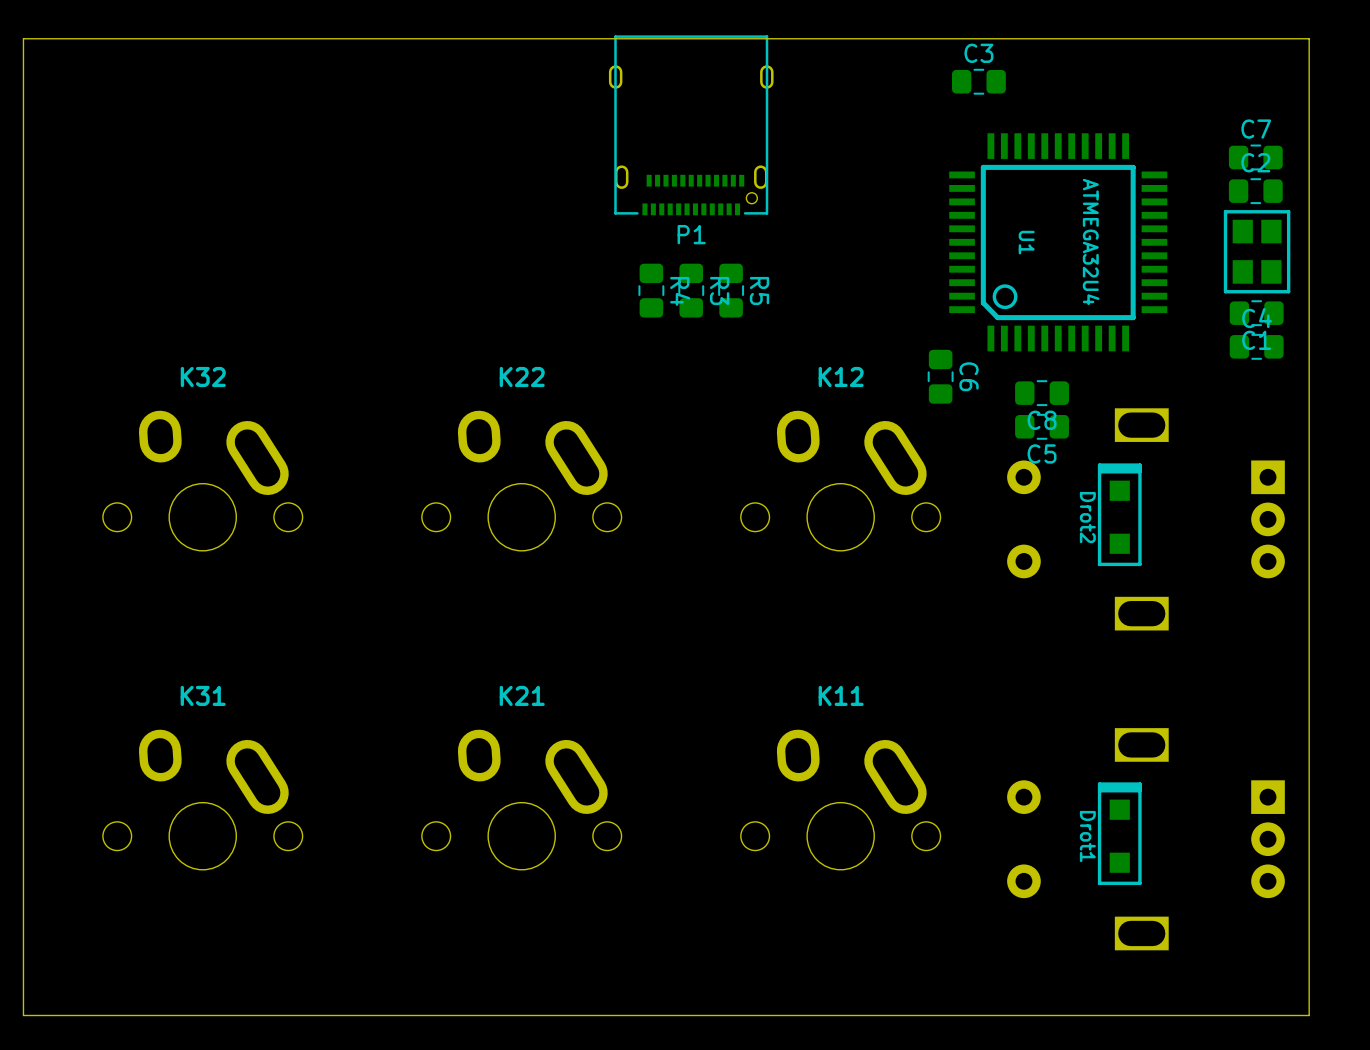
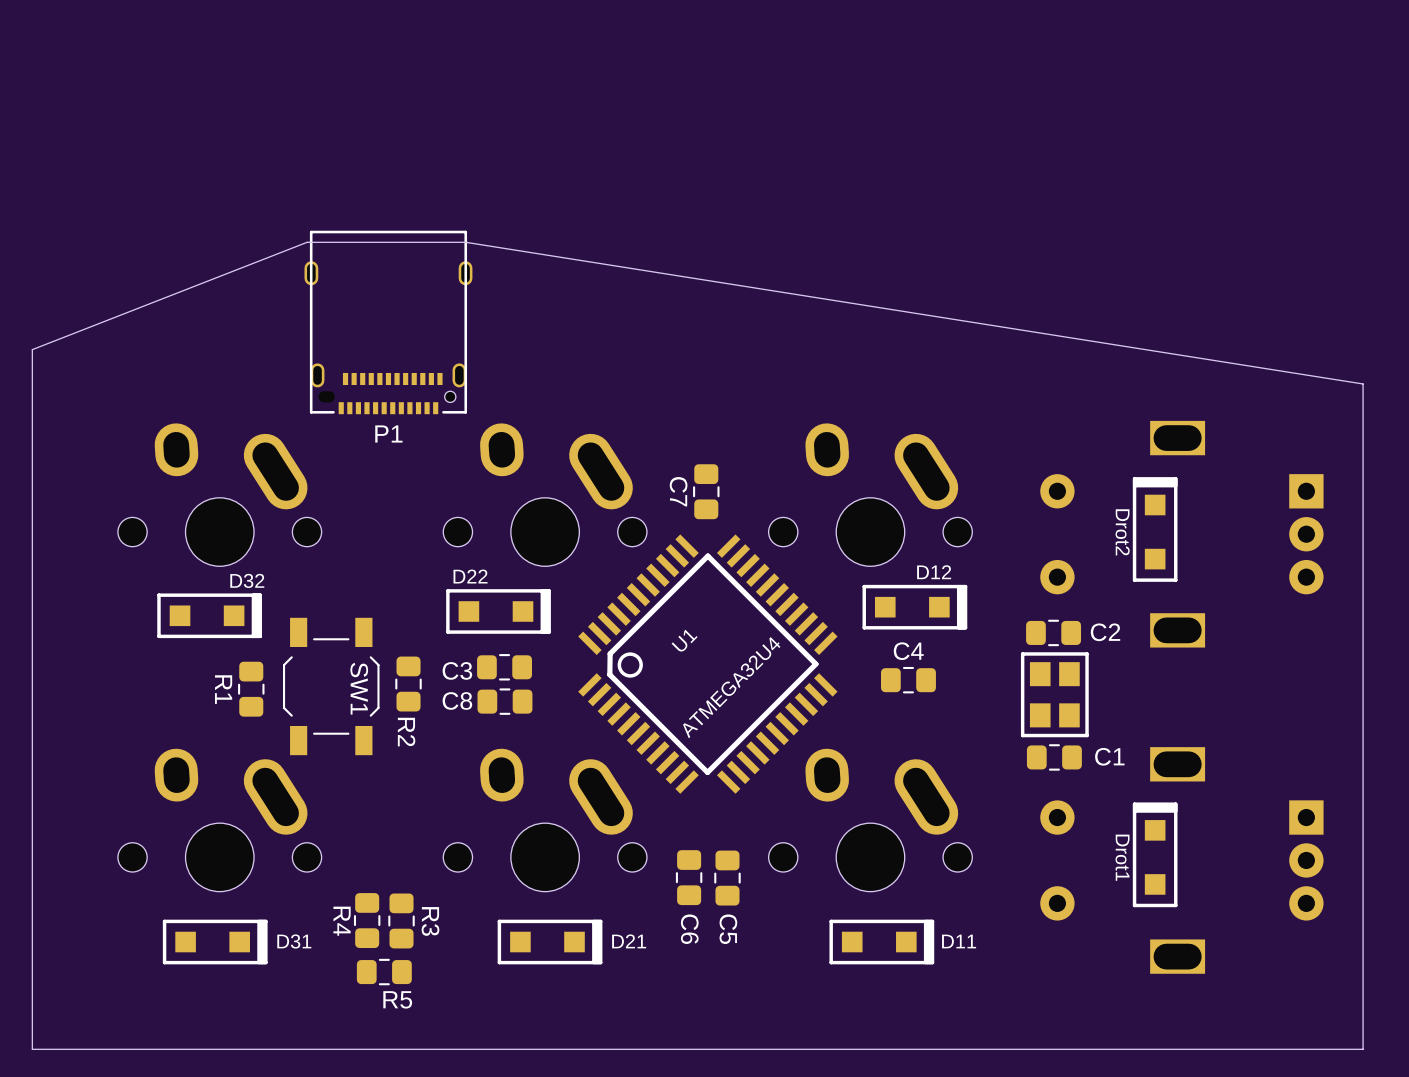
board edge: (1309, 38) (1309, 1015) (23, 1015) (23, 38) (1309, 38) -> (465, 242) (1363, 383) (1363, 1049) (32, 1049) (32, 349) (307, 242) (465, 242)
C3 name position: C3 (978, 53) -> C3 (457, 670)
C3 position: (978, 81) -> (504, 667)
P1 position: (691, 125) -> (388, 322)
C7 name position: C7 (1256, 129) -> C7 (678, 491)
C7 rotation: 0° (1255, 157) -> 90° clockwise (706, 491)
C7 position: (1255, 157) -> (706, 491)
C2 name position: C2 (1255, 162) -> C2 (1105, 632)
C2 position: (1255, 191) -> (1053, 632)
U1 rotation: 0° (1058, 242) -> 45° clockwise (707, 664)
U1 position: (1058, 242) -> (707, 664)
part: (1257, 251) -> none
R4 position: (651, 290) -> (367, 920)
R3 position: (691, 290) -> (401, 920)
R5 rotation: 0° (731, 290) -> 90° clockwise (384, 972)
R5 position: (731, 290) -> (384, 972)
R4 name position: R4 (680, 291) -> R4 (342, 921)
C1 position: (1256, 313) -> (1054, 757)
C1 name position: C1 (1256, 340) -> C1 (1109, 756)
C4 position: (1256, 346) -> (908, 680)
K32 name: K32 (203, 376) -> none
K22 name: K22 (522, 376) -> none
K12 name: K12 (841, 376) -> none
C6 position: (940, 376) -> (689, 877)
C6 name position: C6 (969, 376) -> C6 (689, 929)
C8 position: (1042, 393) -> (504, 701)
C8 name position: C8 (1042, 420) -> C8 (457, 700)
C5 rotation: 0° (1042, 426) -> 90° clockwise (727, 878)
C5 position: (1042, 426) -> (727, 878)
D12: none -> (914, 607)
D22: none -> (498, 611)
D32: none -> (209, 615)
R2: none -> (408, 684)
SW1: none -> (331, 686)
R1: none -> (251, 689)
part: none -> (1054, 694)
K31 name: K31 (203, 695) -> none
K21 name: K21 (522, 695) -> none
K11 name: K11 (841, 695) -> none
D31: none -> (215, 942)
D21: none -> (550, 942)
D11: none -> (881, 942)

